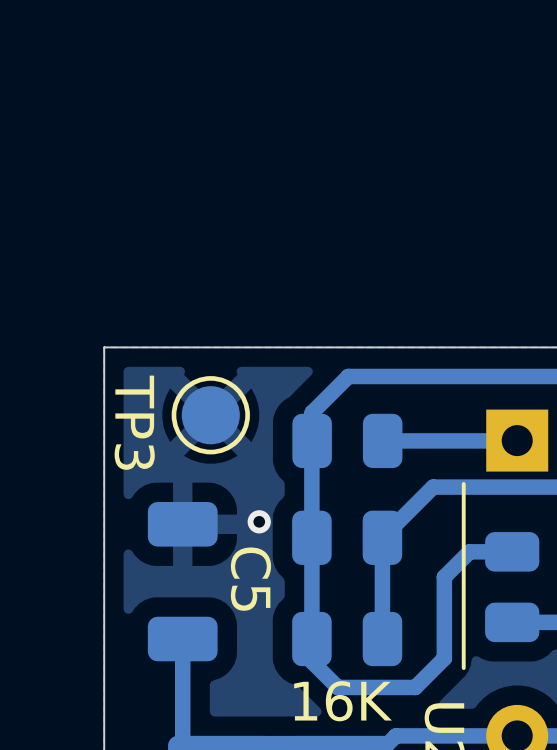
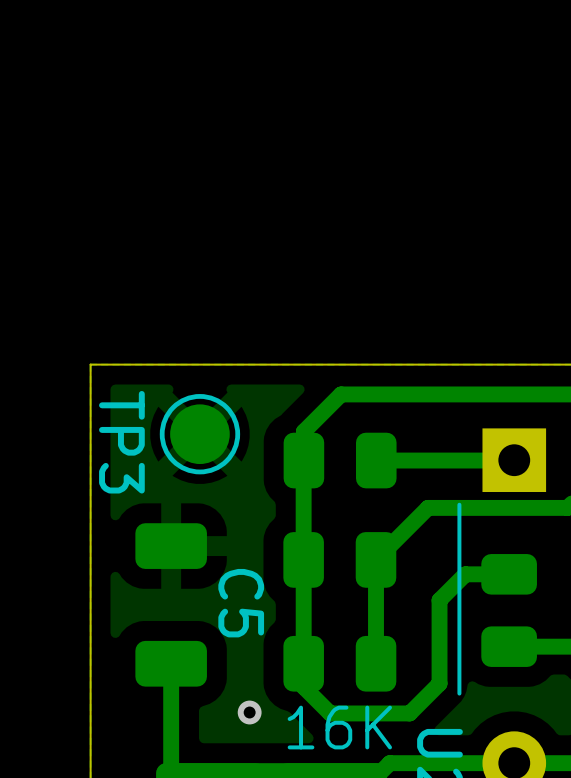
via: (259, 521) -> none
via: none -> (249, 712)

